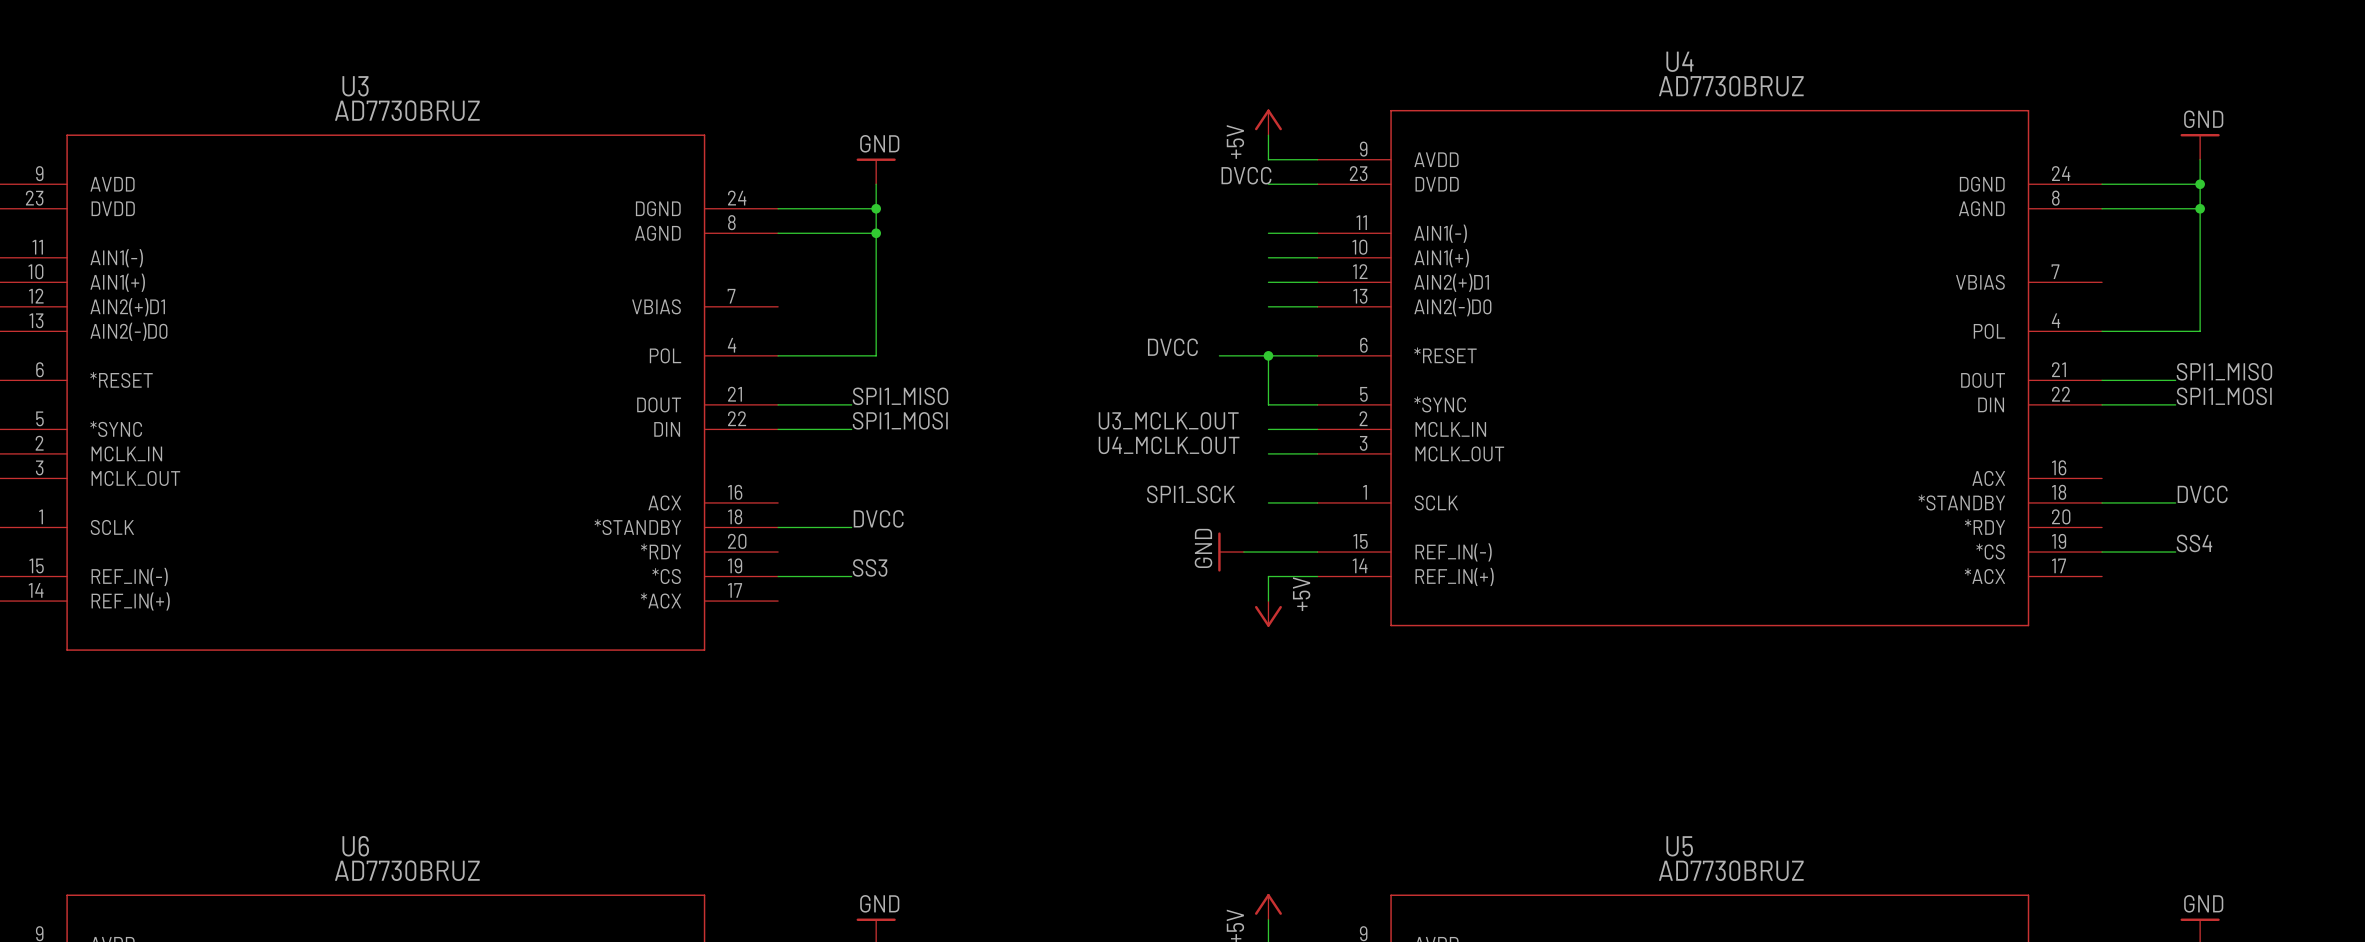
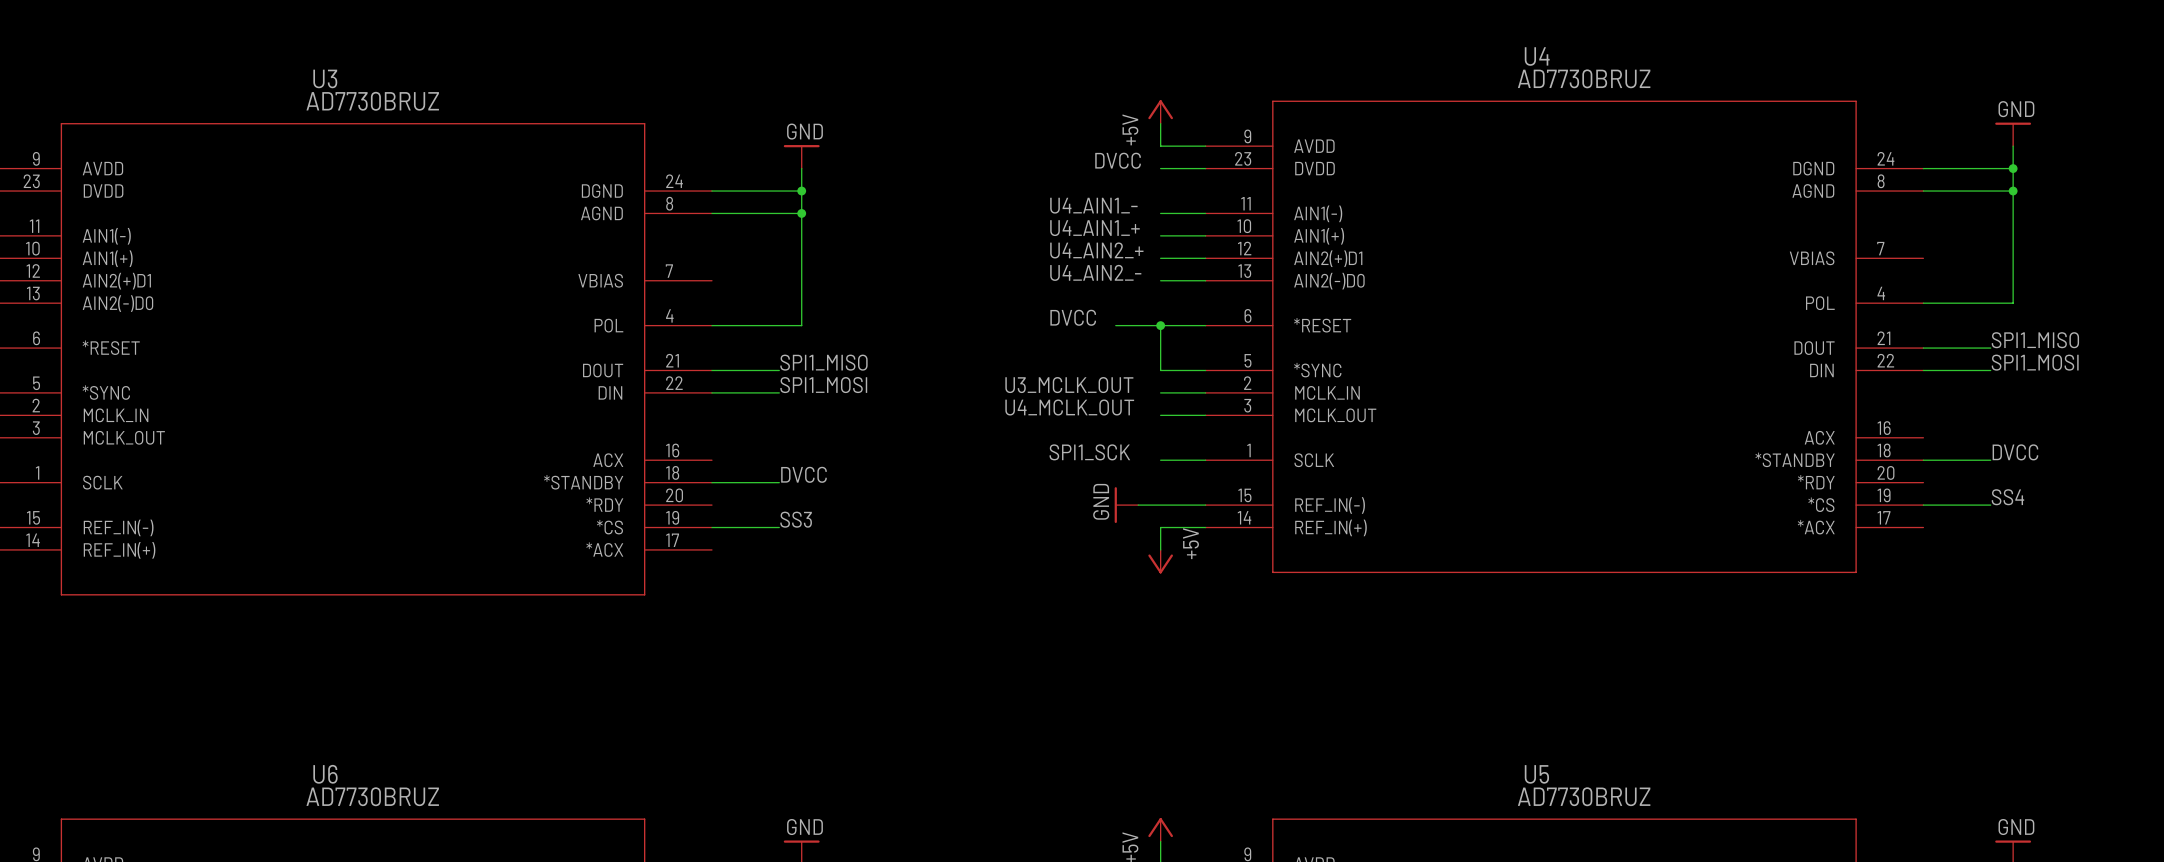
label position: DVCC (1246, 175) -> DVCC (1118, 160)
label: none -> U4_AIN1_- (1093, 205)
label: none -> U4_AIN1_+ (1094, 228)
label: none -> U4_AIN2_+ (1096, 250)
label: none -> U4_AIN2_- (1095, 272)

